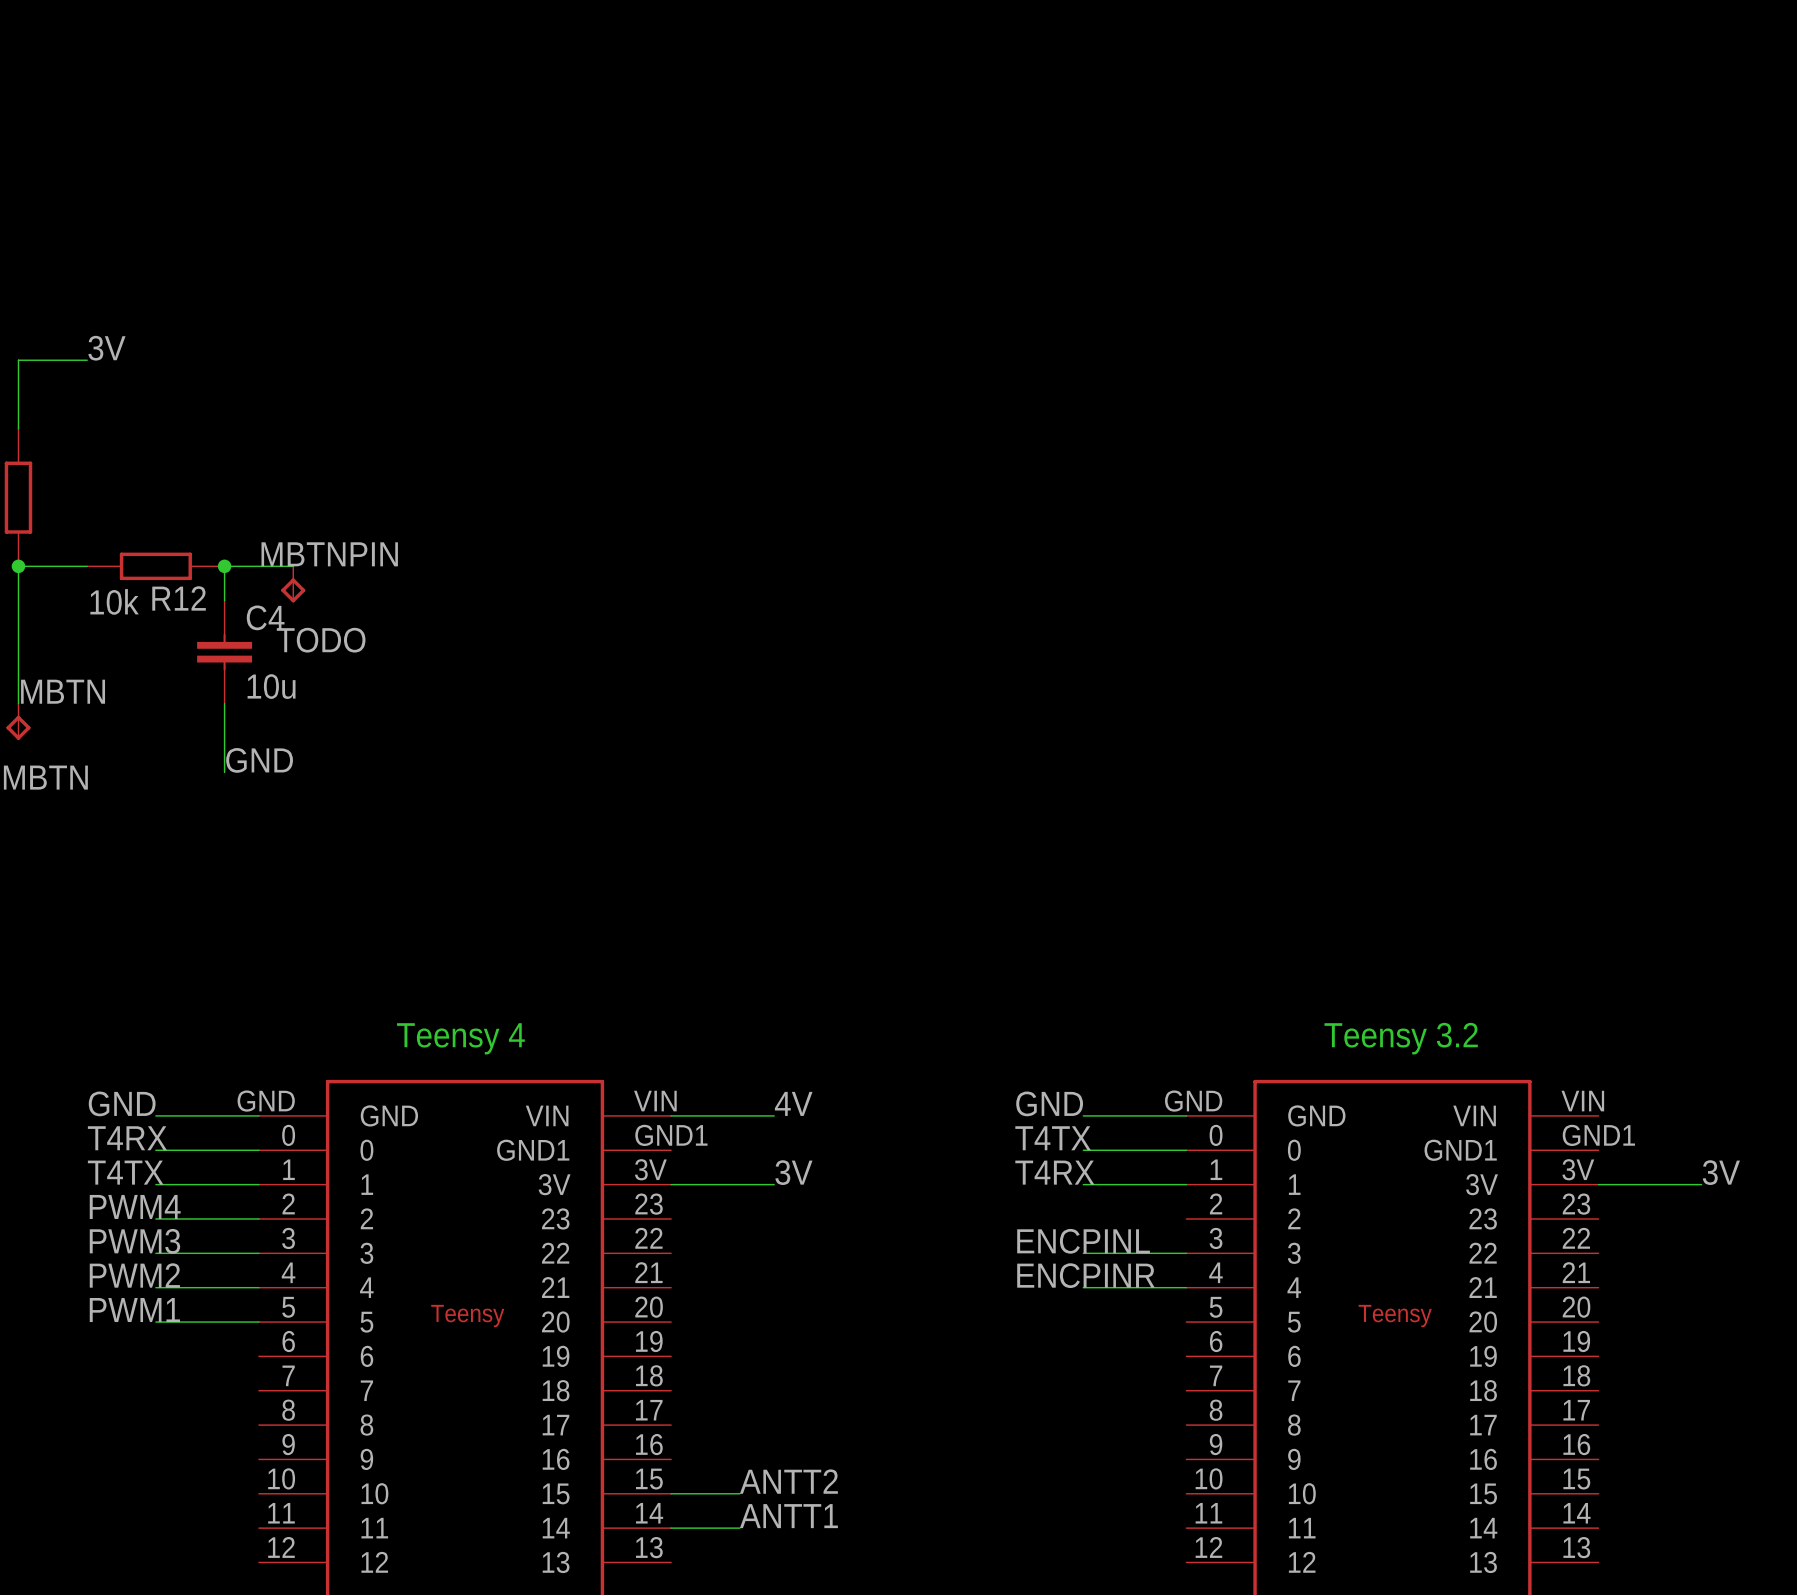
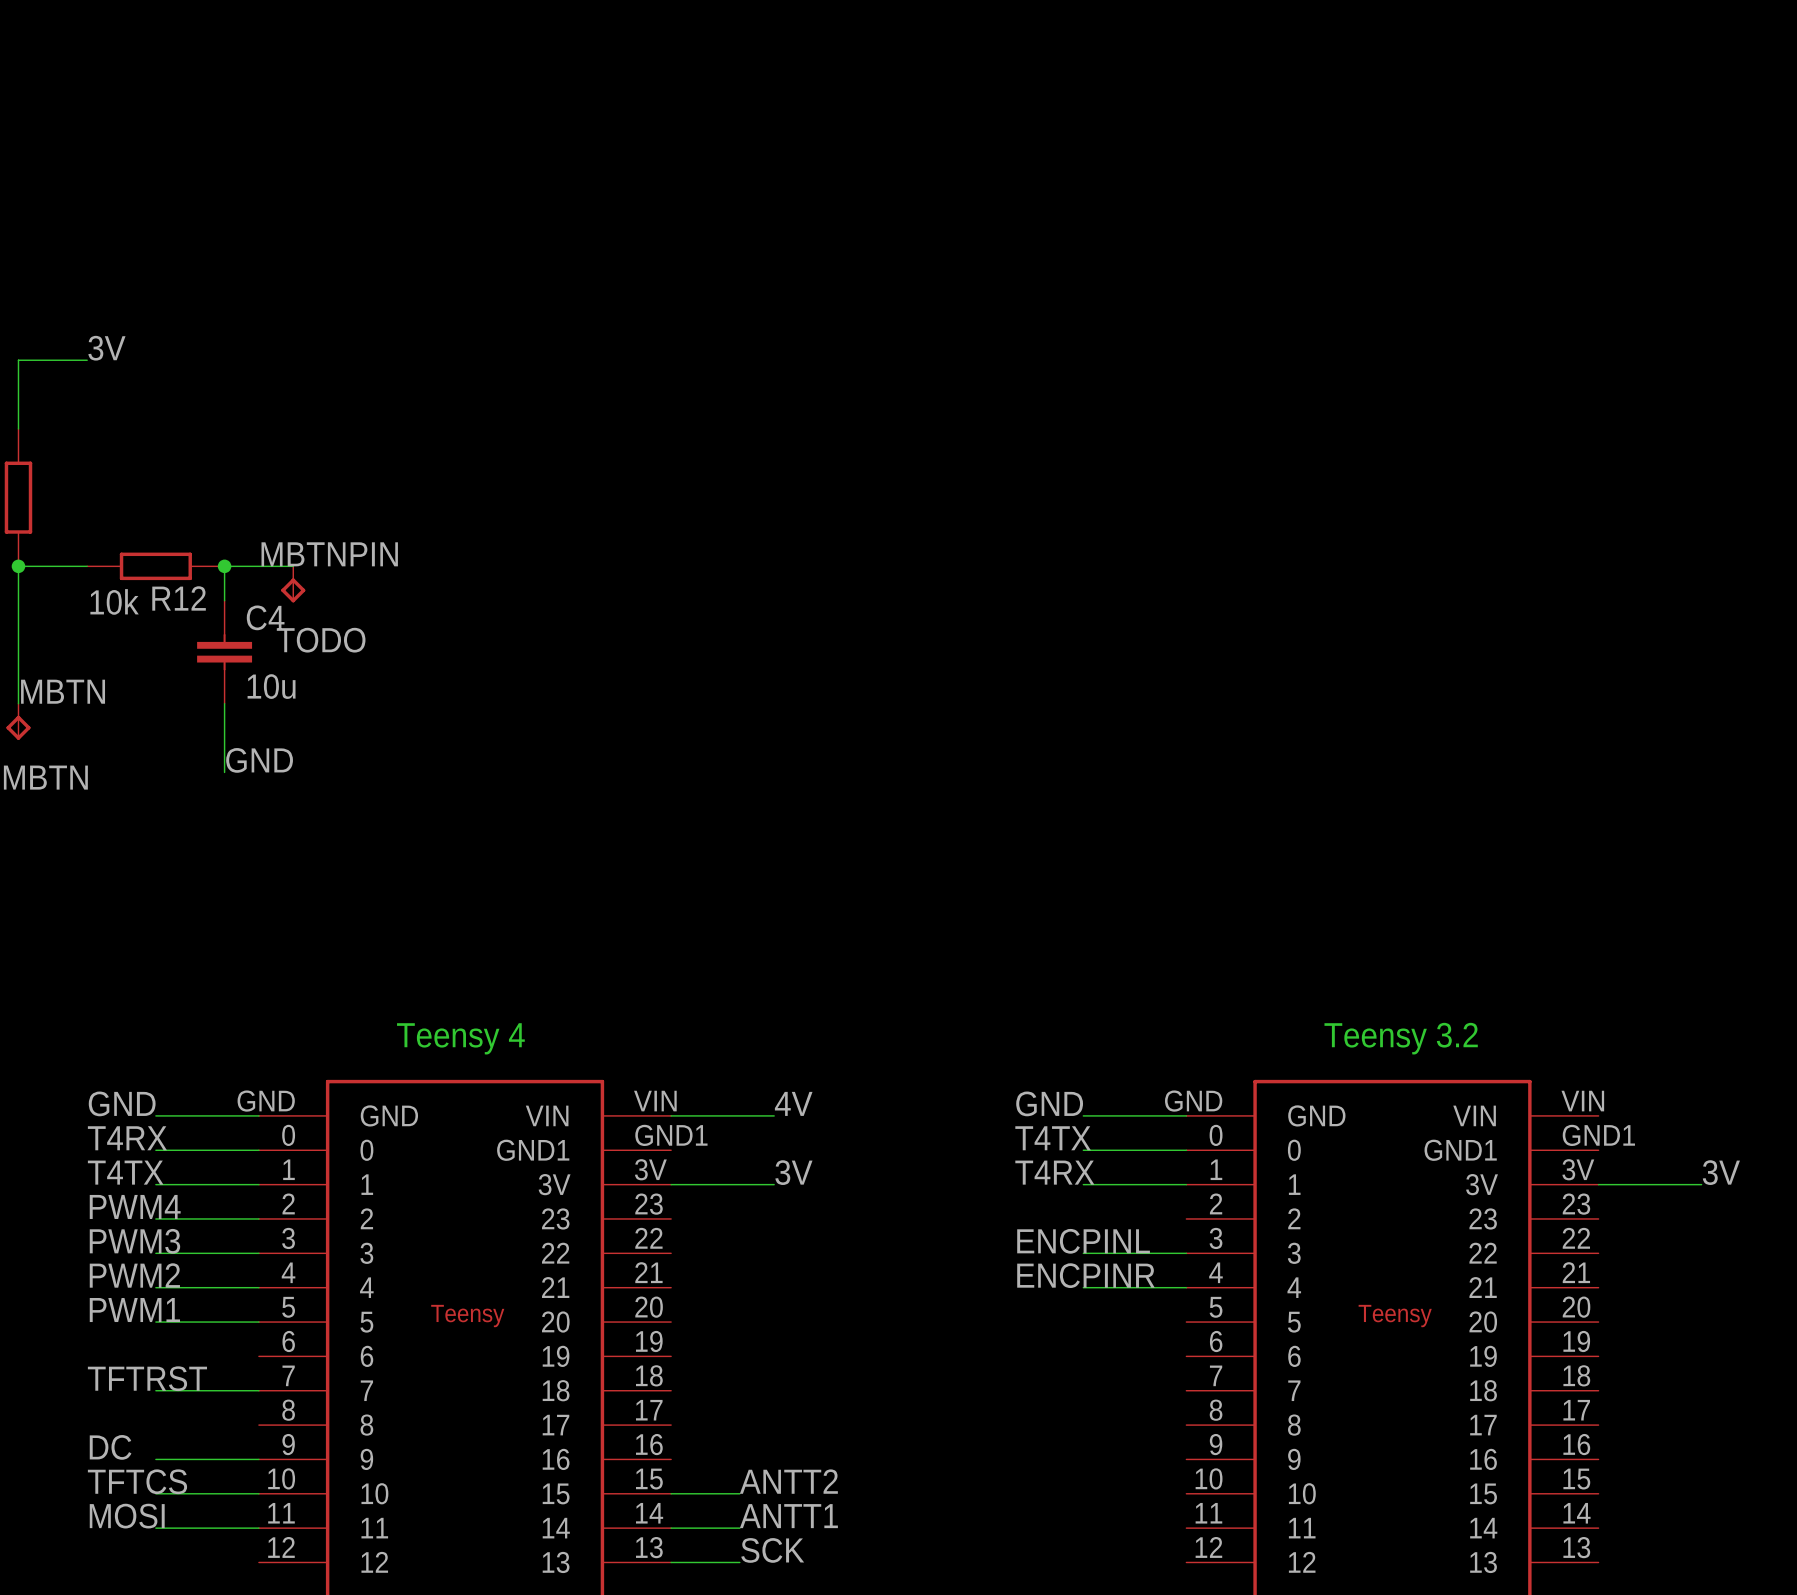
label: none -> TFTRST (147, 1378)
wire: none -> (155, 1390) (258, 1390)
label: none -> DC (110, 1447)
wire: none -> (155, 1459) (258, 1459)
label: none -> TFTCS (137, 1481)
wire: none -> (155, 1493) (258, 1493)
label: none -> MOSI (127, 1516)
wire: none -> (155, 1528) (258, 1528)
label: none -> SCK (772, 1550)
wire: none -> (671, 1562) (739, 1562)

